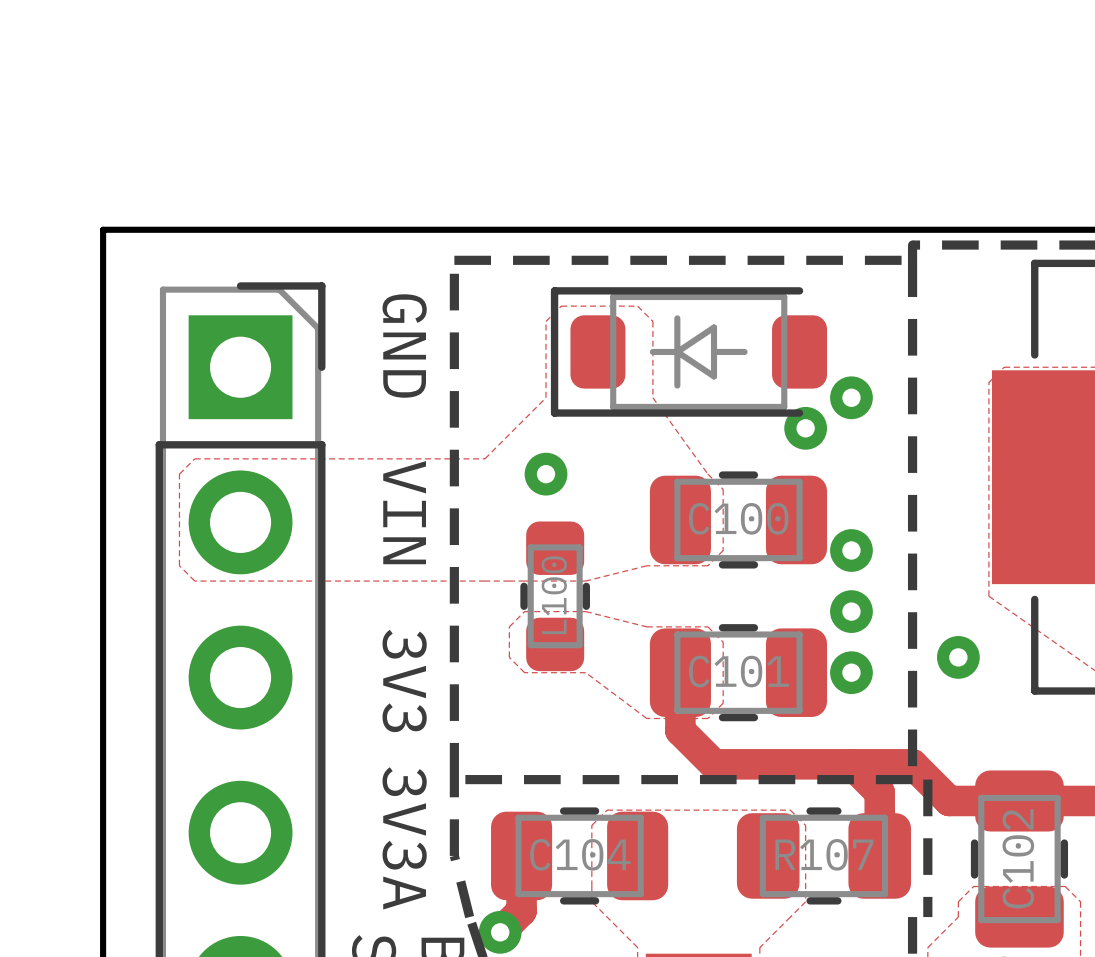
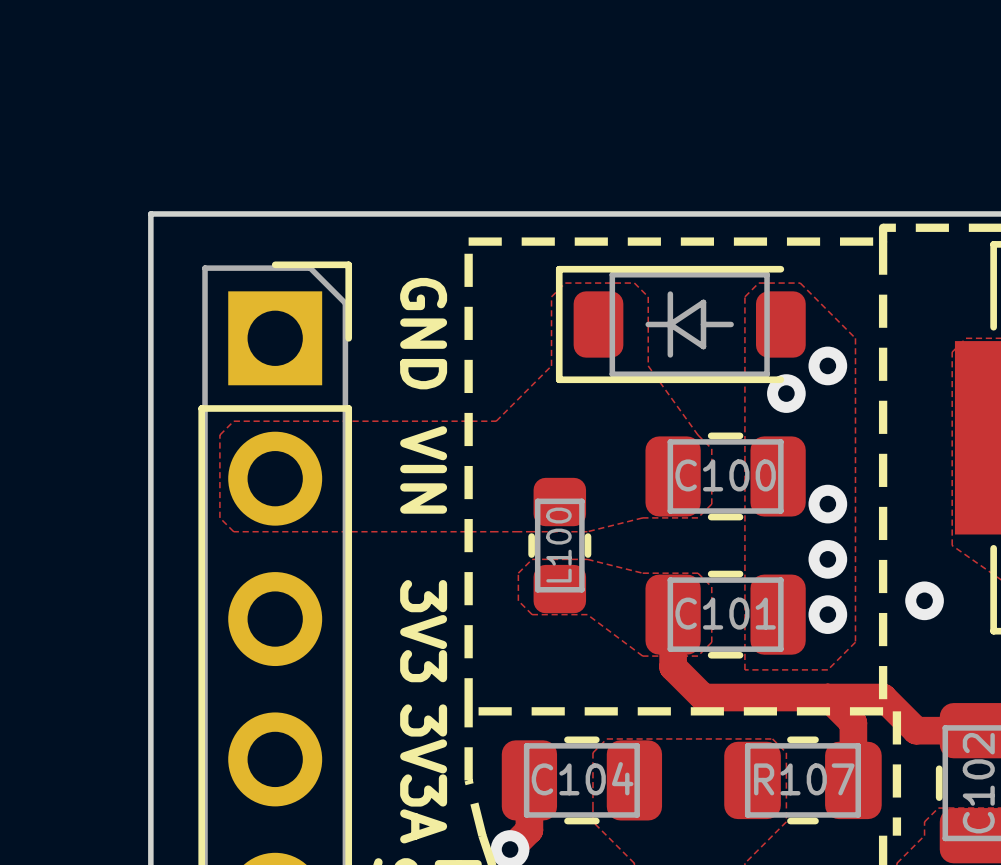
zone outline: none -> (758, 283) (800, 283) (855, 338) (855, 642) (827, 669) (744, 669) (744, 296) (758, 283)
via: (546, 474) -> none

